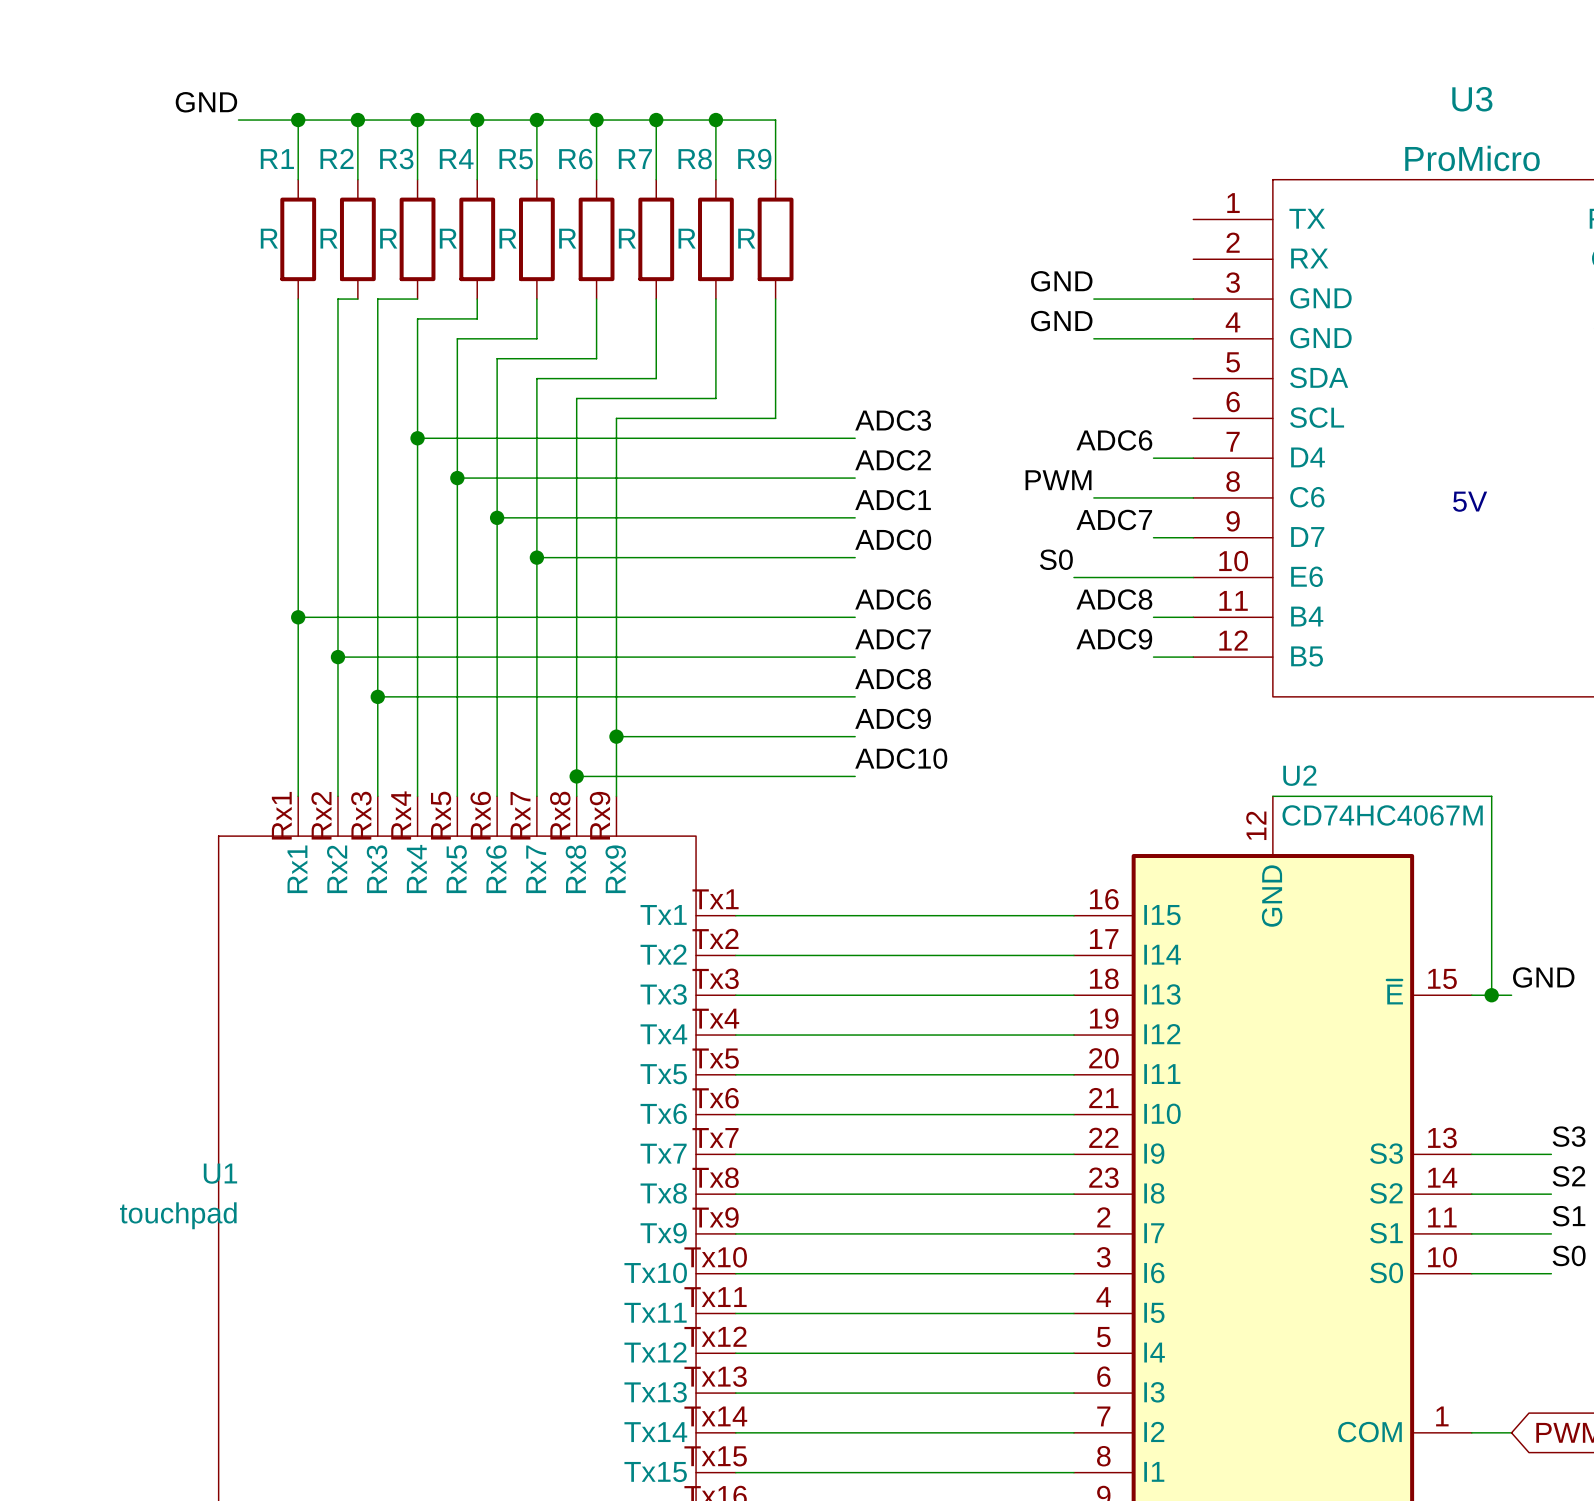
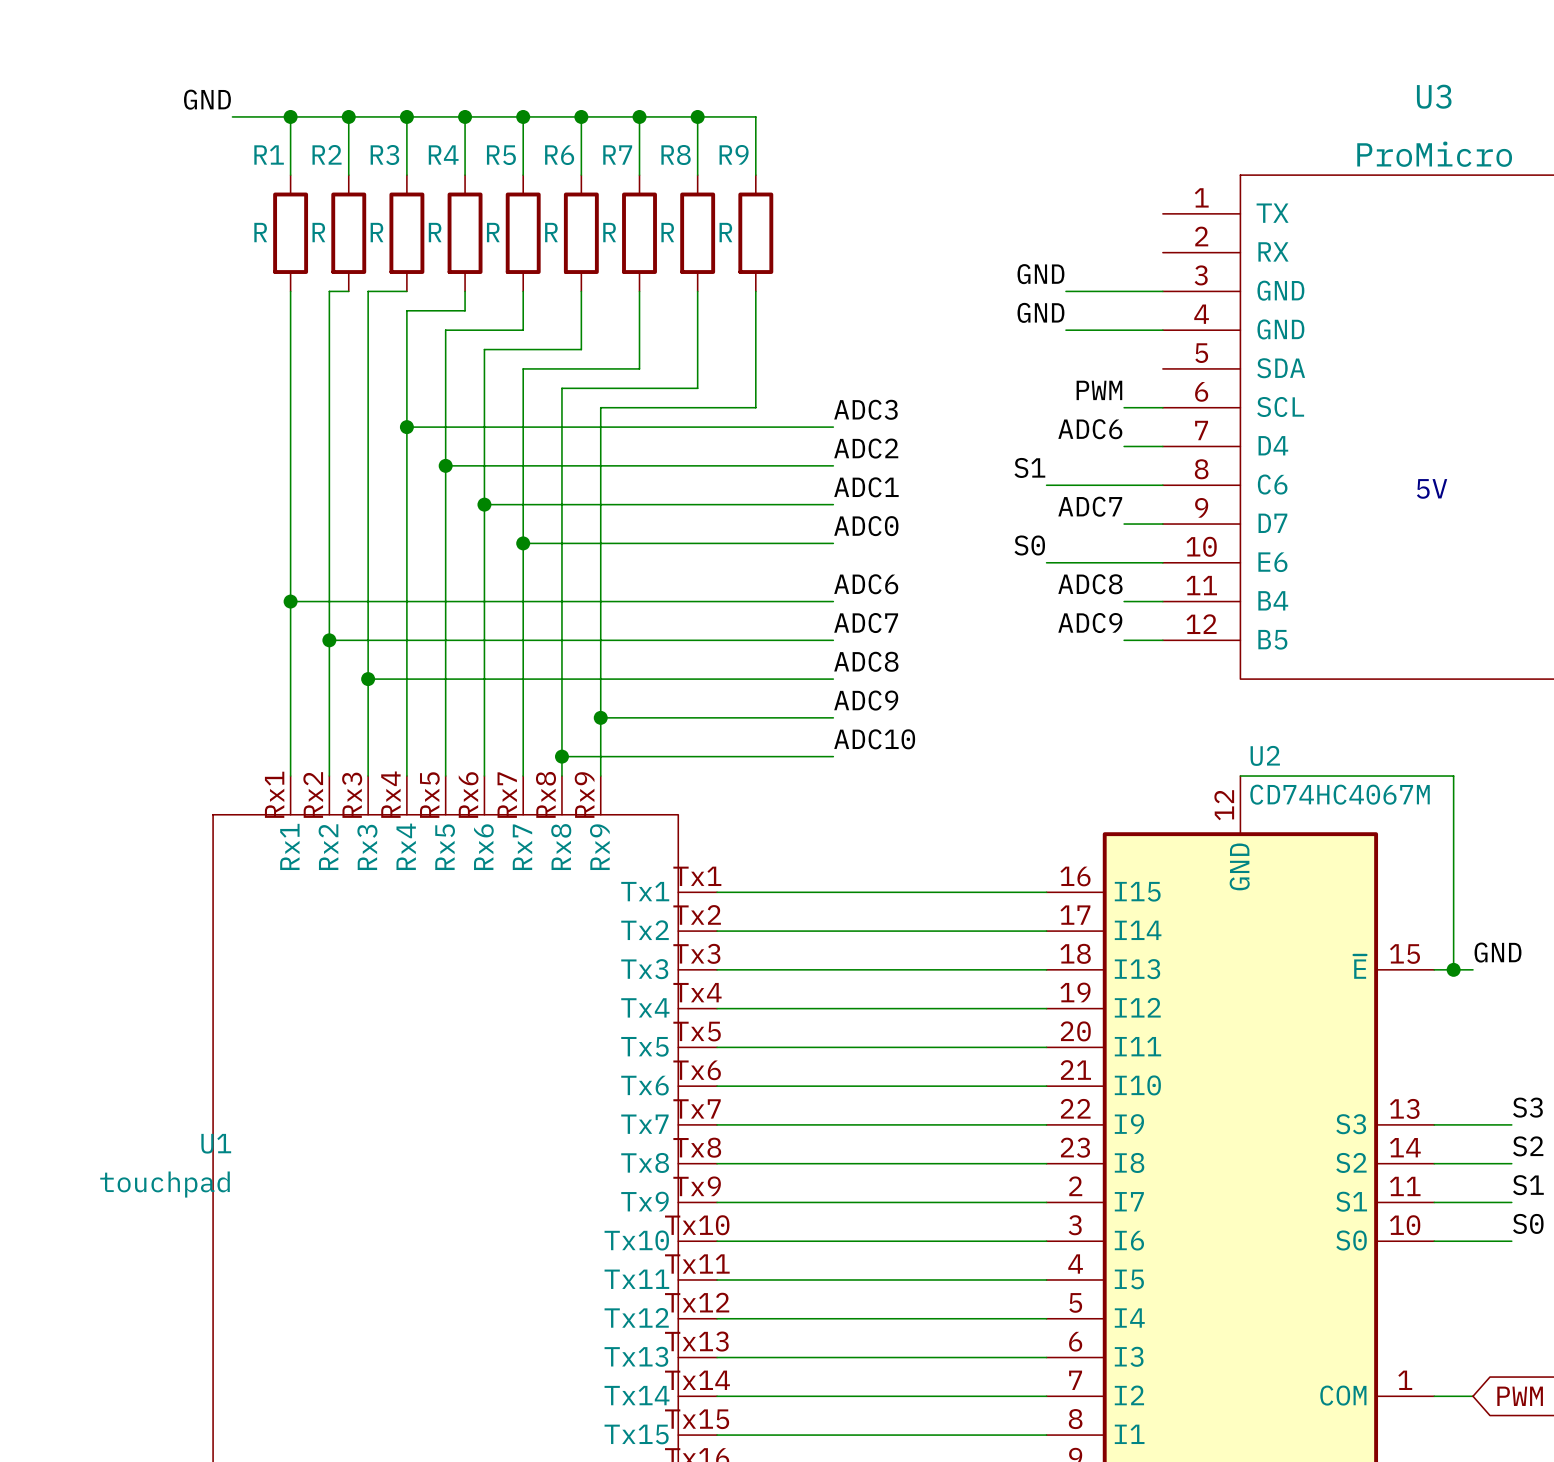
wire: none -> (1124, 407) (1162, 407)
label: none -> S1 (1029, 467)
label position: PWM (1058, 480) -> PWM (1099, 390)
wire: none -> (1046, 485) (1065, 485)

